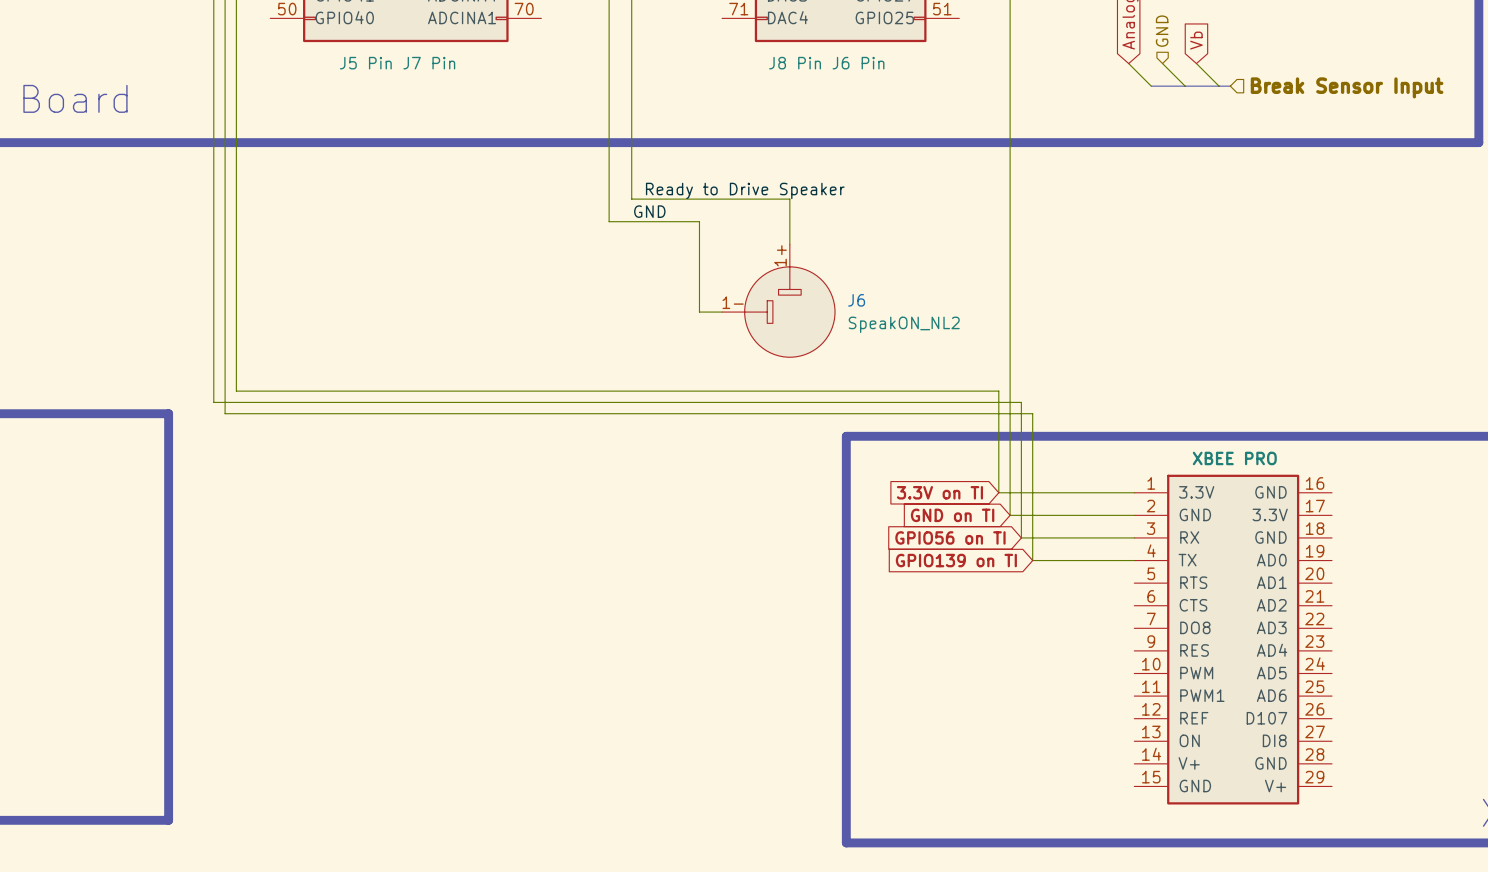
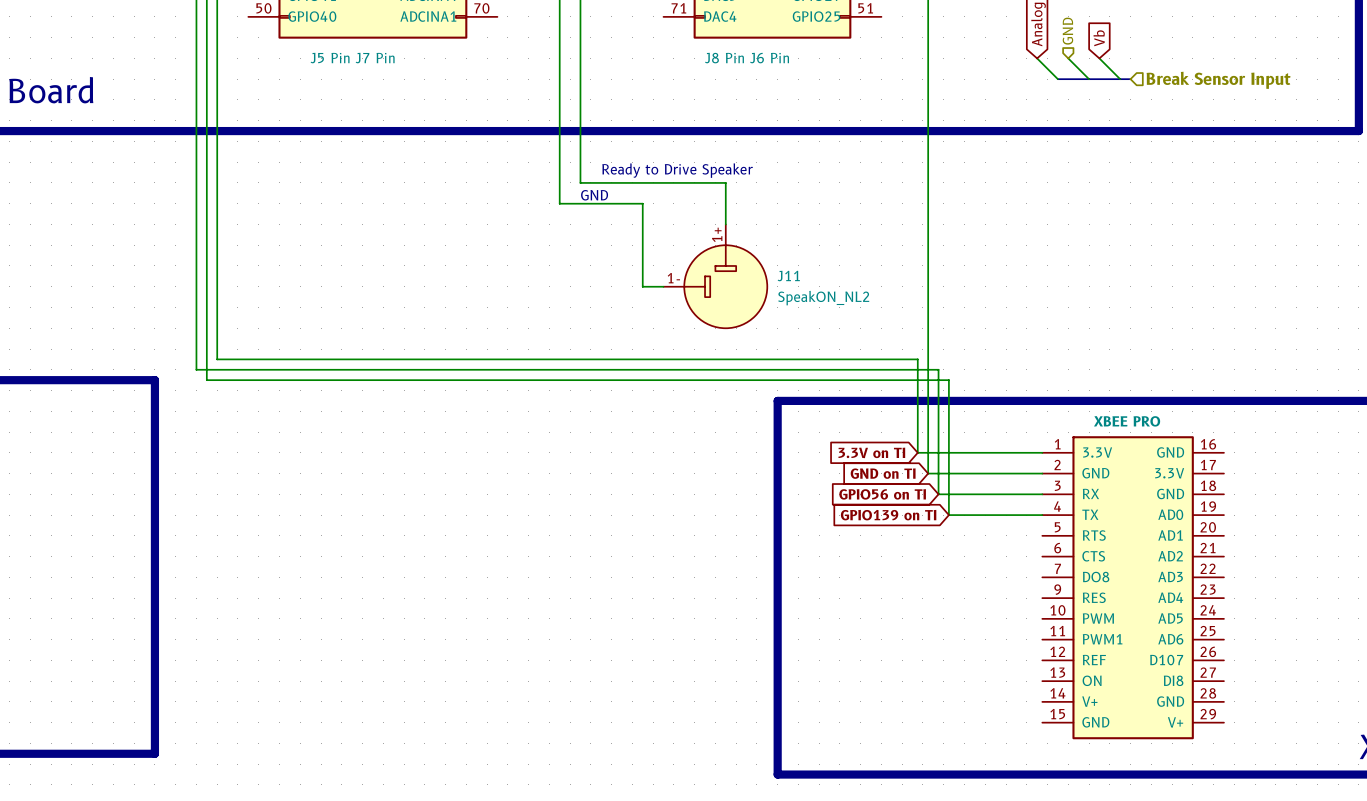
text: none -> Ready to Drive Speaker (677, 170)
label: Ready to Drive Speaker (745, 190) -> none
label: GND (649, 211) -> none
text: none -> GND (594, 195)
J6 name: J6 (856, 300) -> J11 (788, 276)

